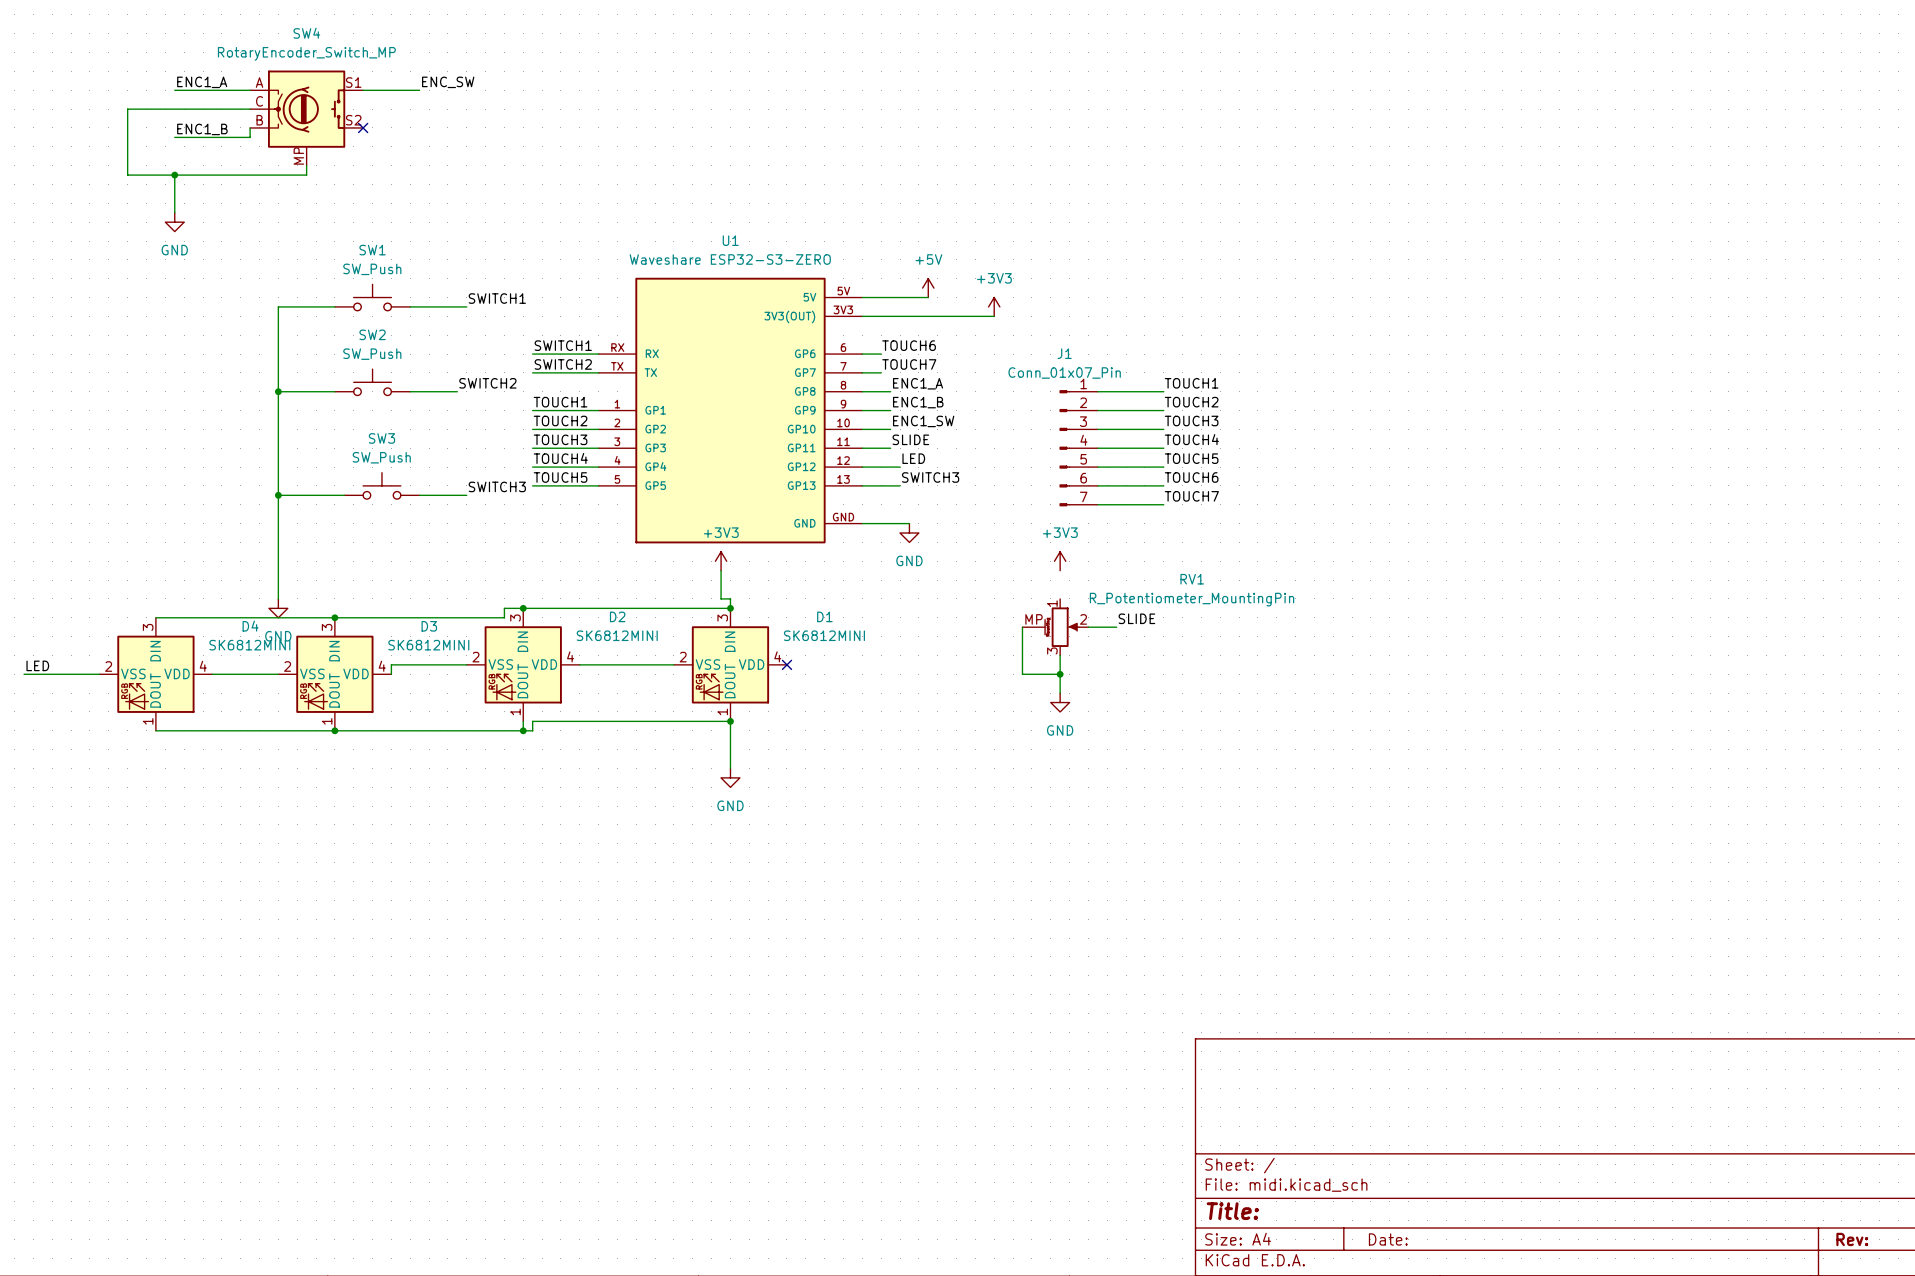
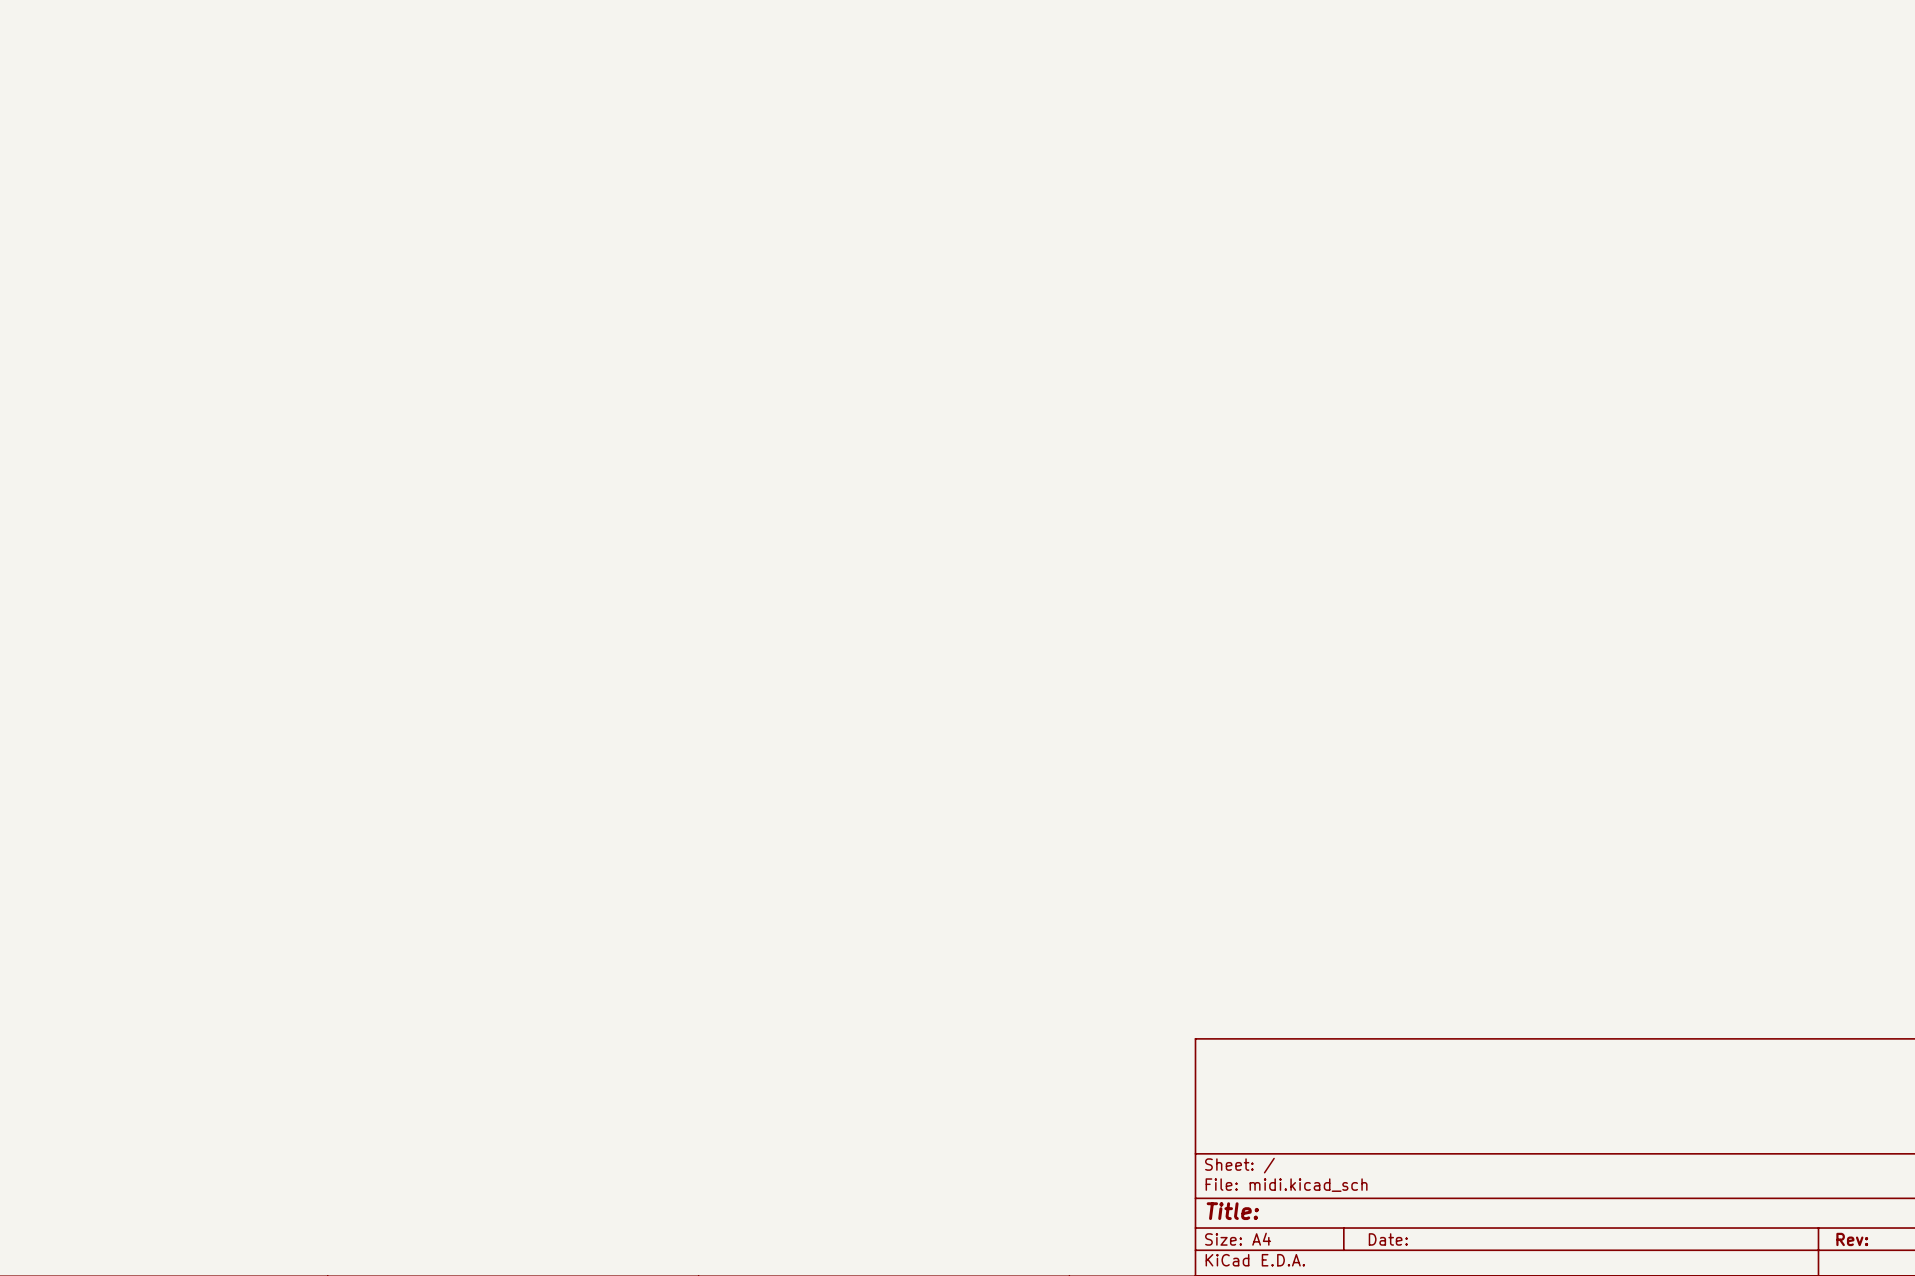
label: ENC1_A (202, 82) -> none
label: ENC_SW (448, 82) -> none
wire: (174, 90) (250, 90) -> none
wire: (363, 90) (419, 90) -> none
wire: (250, 109) (127, 109) (127, 175) (306, 175) (306, 165) -> none
SW4: RotaryEncoder_Switch_MP (306, 118) -> none
wire: (250, 127) (250, 137) (174, 137) -> none
no-connect mark: (363, 127) -> none
label: ENC1_B (202, 129) -> none
wire: (174, 175) (174, 212) -> none
junction: (174, 175) -> none
power symbol: GND (174, 222) -> none
power symbol: +5V (928, 288) -> none
SW1: SW_Push (372, 297) -> none
wire: (862, 297) (928, 297) -> none
label: SWITCH1 (497, 298) -> none
wire: (334, 306) (278, 306) (278, 598) -> none
wire: (410, 306) (466, 306) -> none
power symbol: +3V3 (994, 306) -> none
wire: (862, 316) (994, 316) -> none
label: SWITCH1 (563, 345) -> none
label: TOUCH6 (909, 345) -> none
wire: (532, 354) (598, 354) -> none
wire: (862, 354) (881, 354) -> none
label: SWITCH2 (563, 364) -> none
label: TOUCH7 (909, 364) -> none
wire: (532, 372) (598, 372) -> none
wire: (862, 372) (881, 372) -> none
SW2: SW_Push (372, 382) -> none
label: SWITCH2 (487, 383) -> none
label: ENC1_A (918, 383) -> none
label: TOUCH1 (1191, 383) -> none
wire: (278, 391) (334, 391) -> none
junction: (278, 391) -> none
wire: (410, 391) (457, 391) -> none
wire: (862, 391) (890, 391) -> none
wire: (1097, 391) (1163, 391) -> none
label: TOUCH1 (560, 402) -> none
label: ENC1_B (918, 402) -> none
label: TOUCH2 (1191, 402) -> none
wire: (532, 410) (598, 410) -> none
U1: Waveshare ESP32-S3-ZERO (730, 410) -> none
wire: (862, 410) (890, 410) -> none
wire: (1097, 410) (1163, 410) -> none
label: TOUCH2 (560, 420) -> none
label: TOUCH3 (1191, 420) -> none
label: ENC1_SW (923, 421) -> none
wire: (532, 429) (598, 429) -> none
wire: (862, 429) (890, 429) -> none
wire: (1097, 429) (1163, 429) -> none
label: TOUCH3 (560, 439) -> none
label: SLIDE (910, 439) -> none
label: TOUCH4 (1191, 439) -> none
wire: (532, 448) (598, 448) -> none
wire: (862, 448) (890, 448) -> none
J1: Conn_01x07_Pin (1078, 448) -> none
wire: (1097, 448) (1163, 448) -> none
label: TOUCH4 (560, 458) -> none
label: LED (913, 458) -> none
label: TOUCH5 (1191, 458) -> none
wire: (532, 467) (598, 467) -> none
wire: (862, 467) (900, 467) -> none
wire: (1097, 467) (1163, 467) -> none
label: TOUCH5 (560, 477) -> none
label: SWITCH3 (930, 477) -> none
label: TOUCH6 (1191, 477) -> none
SW3: SW_Push (381, 485) -> none
wire: (532, 485) (598, 485) -> none
wire: (862, 485) (900, 485) -> none
wire: (1097, 485) (1163, 485) -> none
label: SWITCH3 (497, 486) -> none
wire: (278, 495) (344, 495) -> none
junction: (278, 495) -> none
wire: (419, 495) (466, 495) -> none
label: TOUCH7 (1191, 496) -> none
wire: (1097, 504) (1163, 504) -> none
wire: (862, 523) (909, 523) -> none
power symbol: GND (909, 533) -> none
power symbol: +3V3 (721, 561) -> none
power symbol: +3V3 (1060, 561) -> none
wire: (721, 570) (721, 598) (730, 598) (730, 608) (504, 608) (504, 617) (155, 617) -> none
power symbol: GND (278, 608) -> none
junction: (523, 608) -> none
junction: (730, 608) -> none
junction: (334, 617) -> none
label: SLIDE (1136, 618) -> none
wire: (1022, 627) (1022, 674) (1060, 674) -> none
RV1: R_Potentiometer_MountingPin (1055, 627) -> none
wire: (1088, 627) (1116, 627) -> none
wire: (1060, 655) (1060, 693) -> none
wire: (466, 664) (391, 664) (391, 674) -> none
D2: SK6812MINI (523, 664) -> none
wire: (579, 664) (673, 664) -> none
D1: SK6812MINI (730, 664) -> none
no-connect mark: (786, 664) -> none
label: LED (37, 665) -> none
wire: (24, 674) (99, 674) -> none
D4: SK6812MINI (155, 674) -> none
wire: (212, 674) (278, 674) -> none
D3: SK6812MINI (334, 674) -> none
junction: (1060, 674) -> none
power symbol: GND (1060, 702) -> none
wire: (523, 721) (523, 730) -> none
junction: (730, 721) -> none
wire: (155, 730) (532, 730) (532, 721) (730, 721) (730, 768) -> none
junction: (334, 730) -> none
junction: (523, 730) -> none
power symbol: GND (730, 777) -> none

